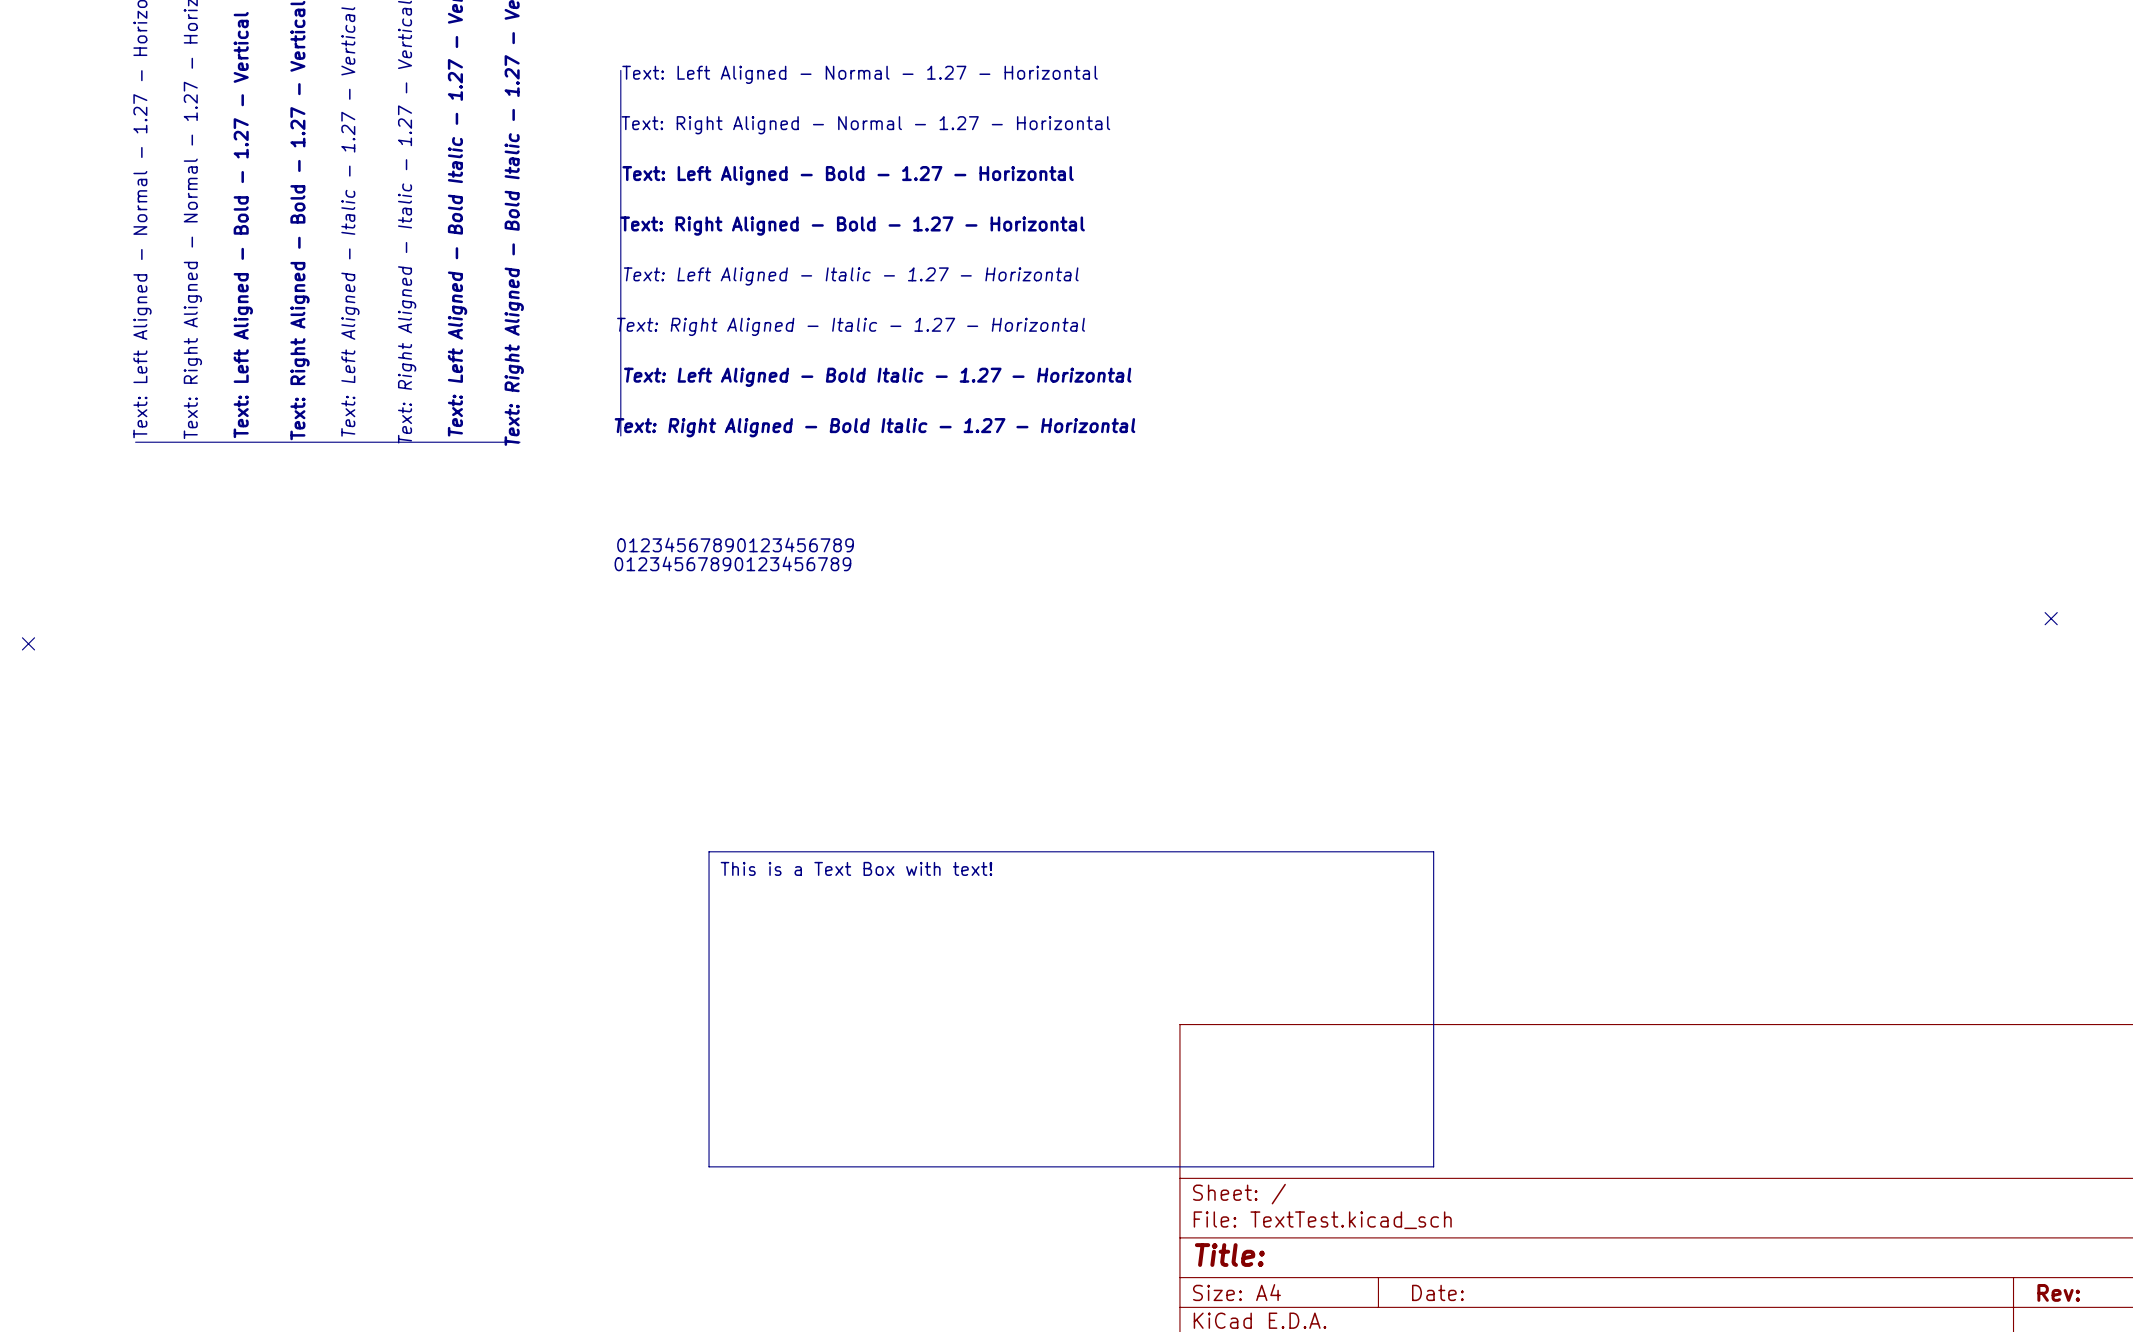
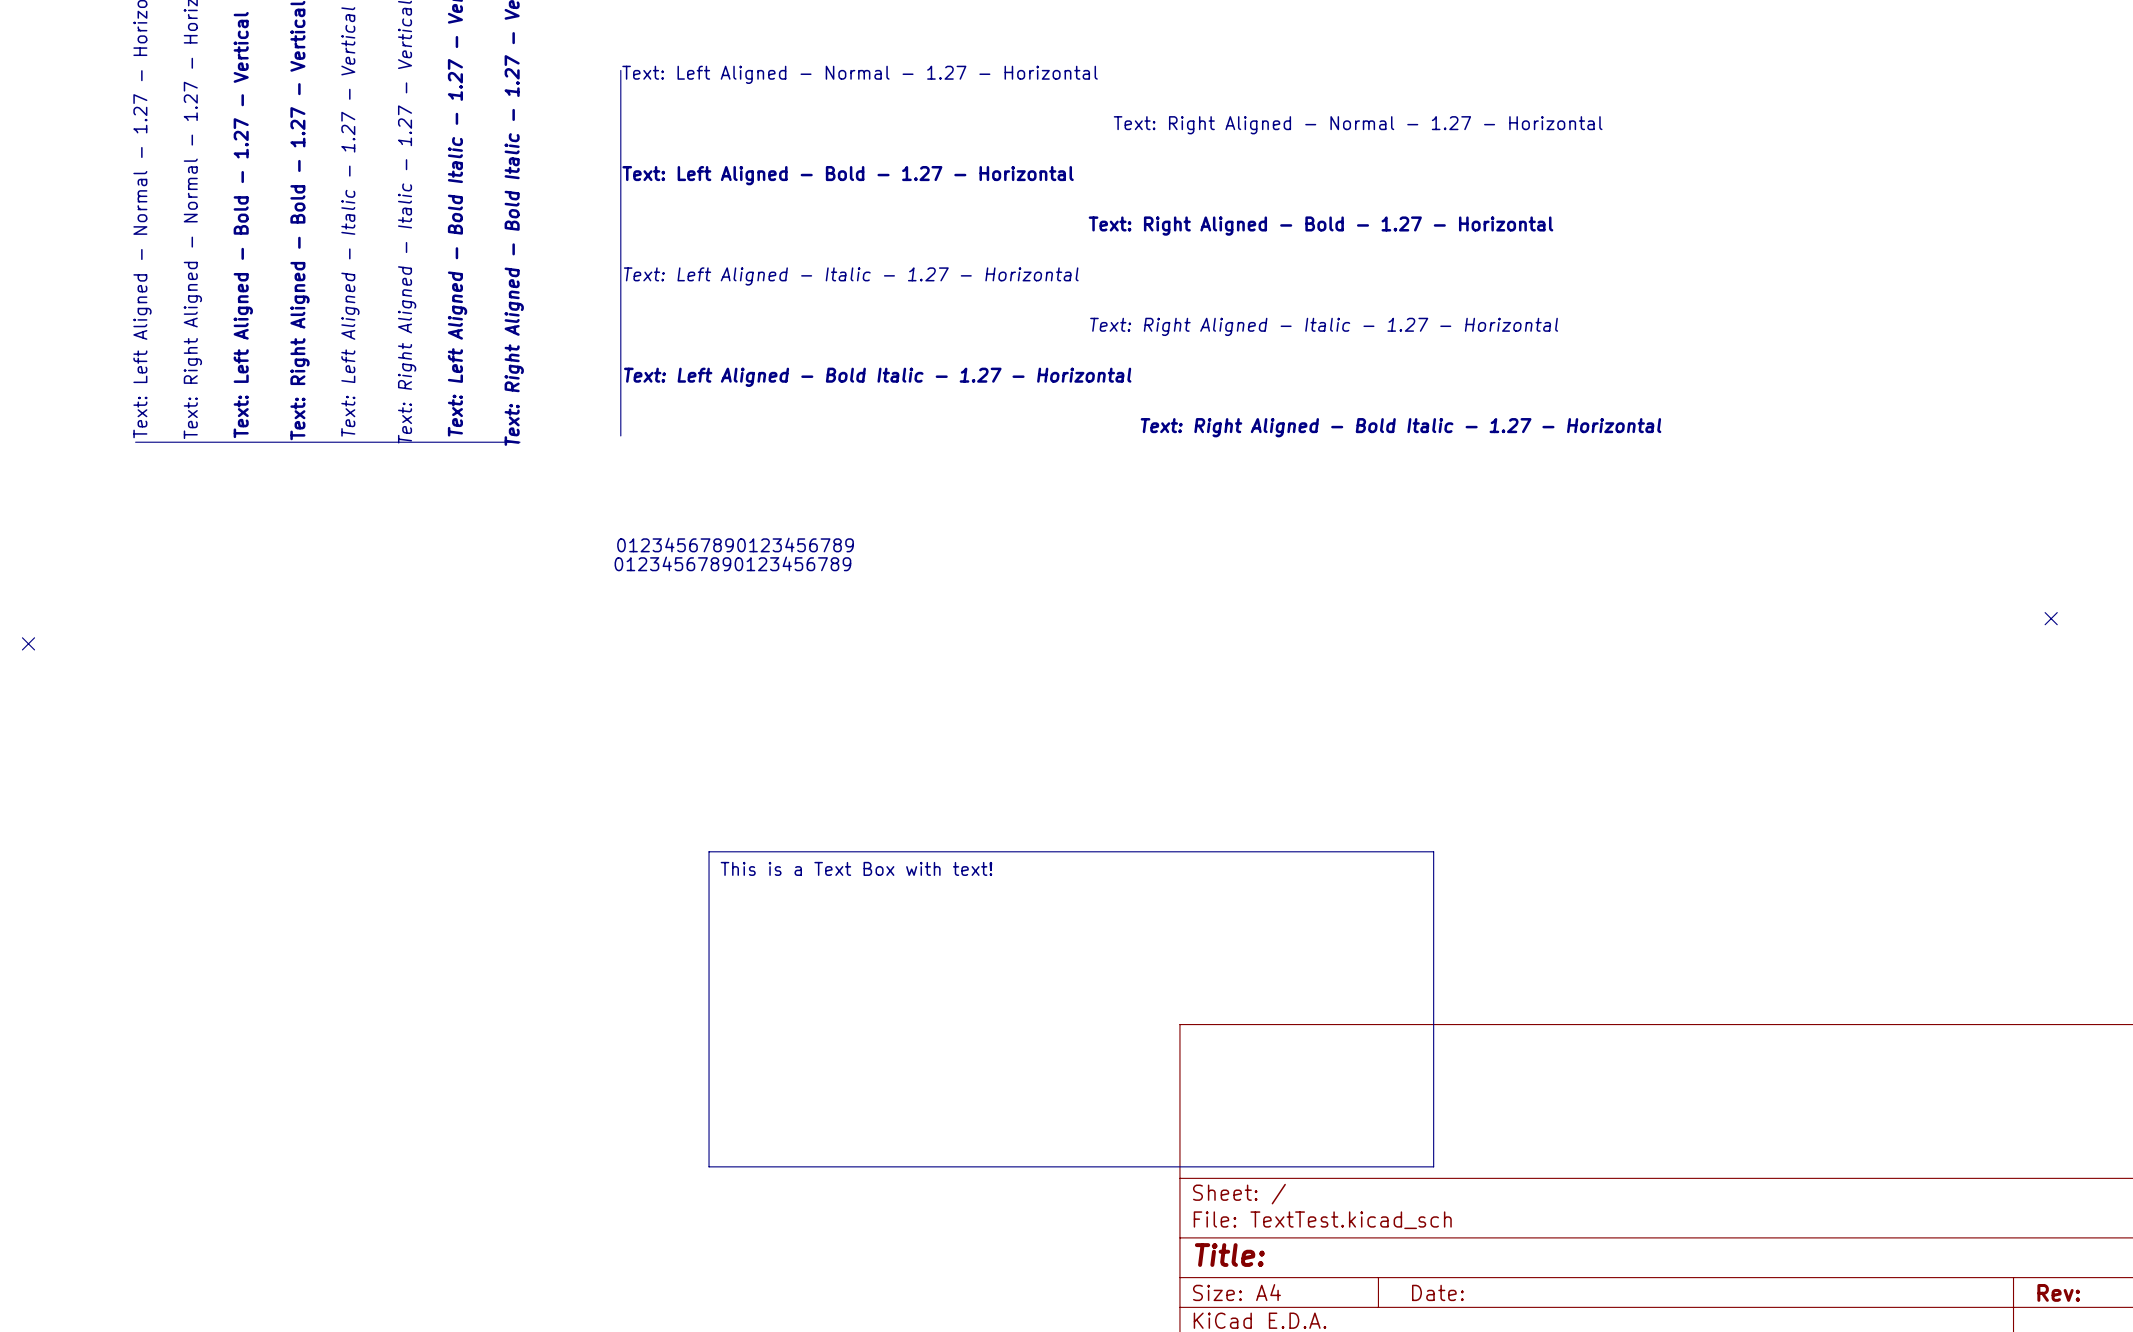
text position: Text: Right Aligned - Normal - 1.27 - Horizontal (865, 125) -> Text: Right Aligned - Normal - 1.27 - Horizontal (1358, 125)
text position: Text: Right Aligned - Bold - 1.27 - Horizontal (852, 226) -> Text: Right Aligned - Bold - 1.27 - Horizontal (1320, 226)
text position: Text: Right Aligned - Italic - 1.27 - Horizontal (851, 326) -> Text: Right Aligned - Italic - 1.27 - Horizontal (1324, 326)
text position: Text: Right Aligned - Bold Italic - 1.27 - Horizontal (874, 427) -> Text: Right Aligned - Bold Italic - 1.27 - Horizontal (1401, 427)

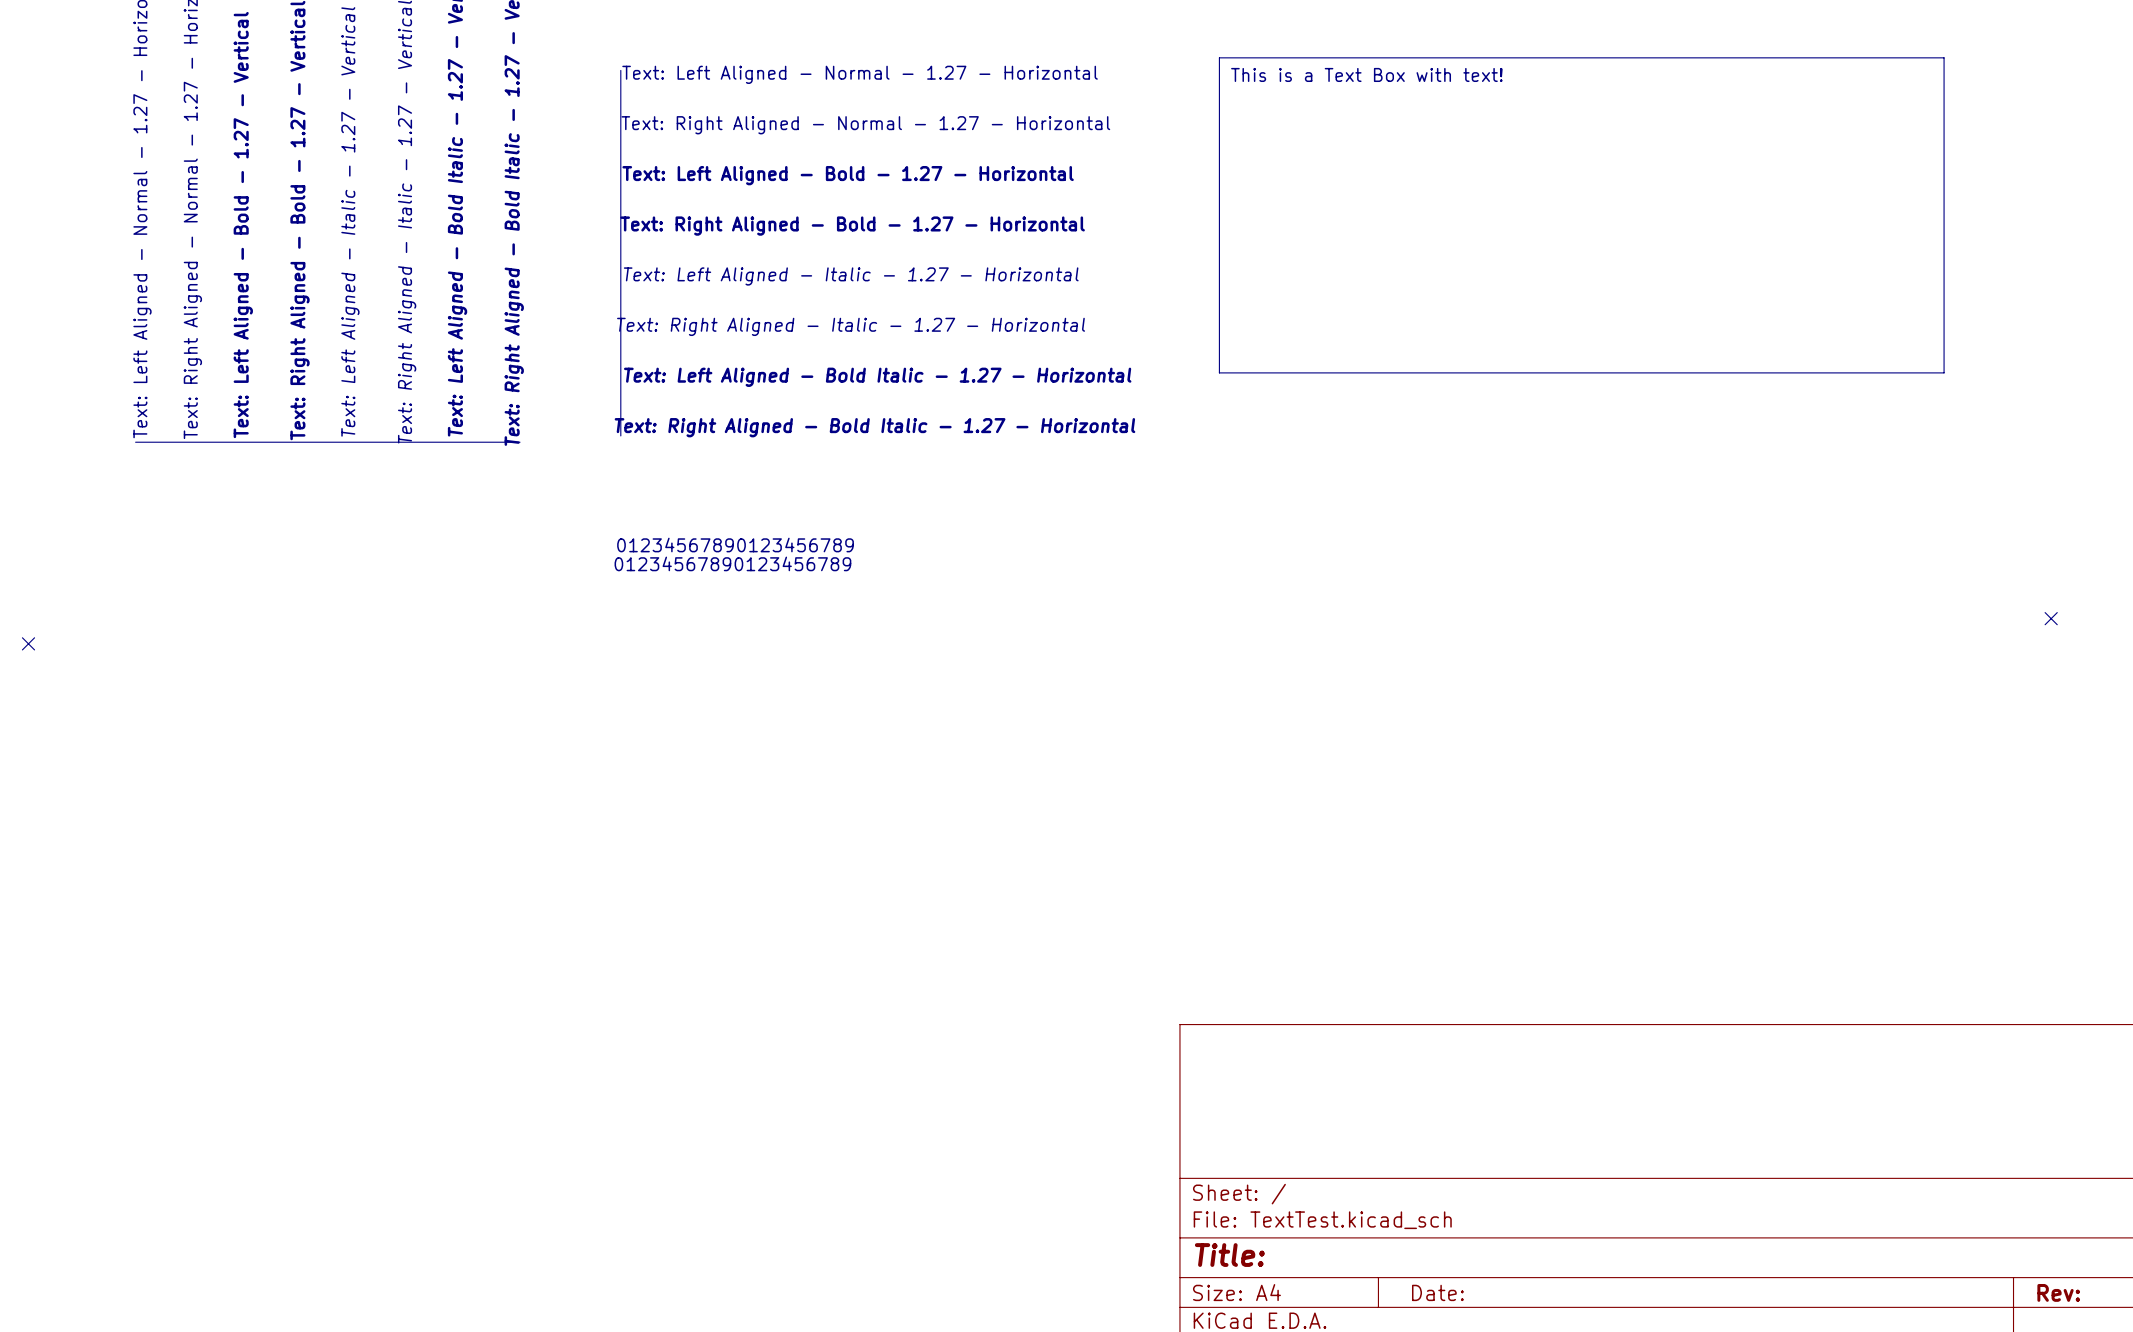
line: none -> (1219, 57) (1944, 57) (1944, 372) (1219, 372) (1219, 57)
text: none -> This is a Text Box with text! (1366, 74)
text position: Text: Right Aligned - Normal - 1.27 - Horizontal (1358, 125) -> Text: Right Aligned - Normal - 1.27 - Horizontal (865, 125)
text position: Text: Right Aligned - Bold - 1.27 - Horizontal (1320, 226) -> Text: Right Aligned - Bold - 1.27 - Horizontal (852, 226)
text position: Text: Right Aligned - Italic - 1.27 - Horizontal (1324, 326) -> Text: Right Aligned - Italic - 1.27 - Horizontal (851, 326)
text position: Text: Right Aligned - Bold Italic - 1.27 - Horizontal (1401, 427) -> Text: Right Aligned - Bold Italic - 1.27 - Horizontal (874, 427)
line: (709, 851) (1433, 851) (1433, 1166) (709, 1166) (709, 851) -> none
text: This is a Text Box with text! (856, 868) -> none

